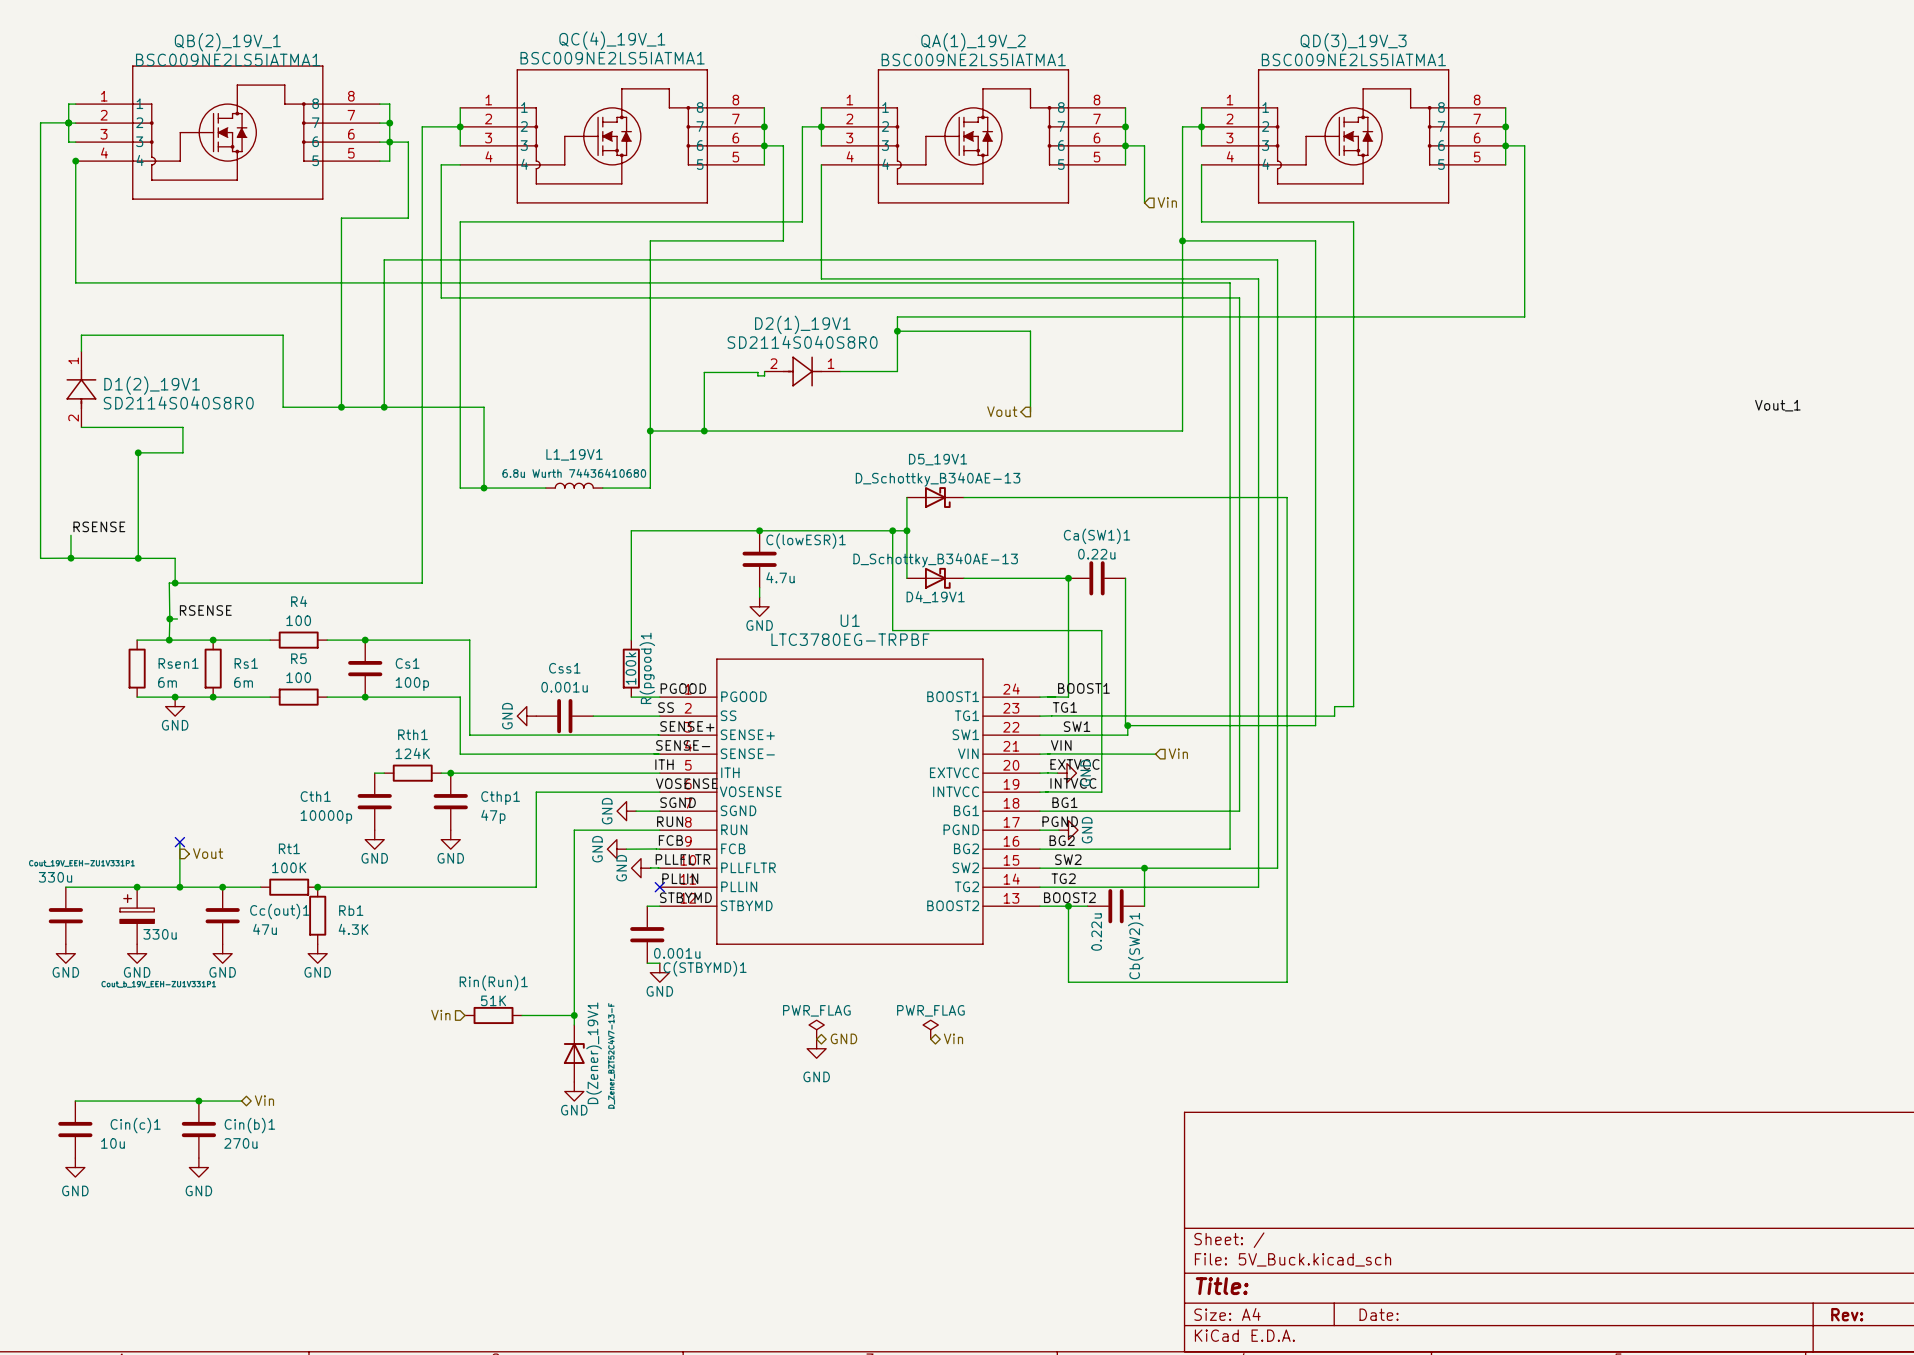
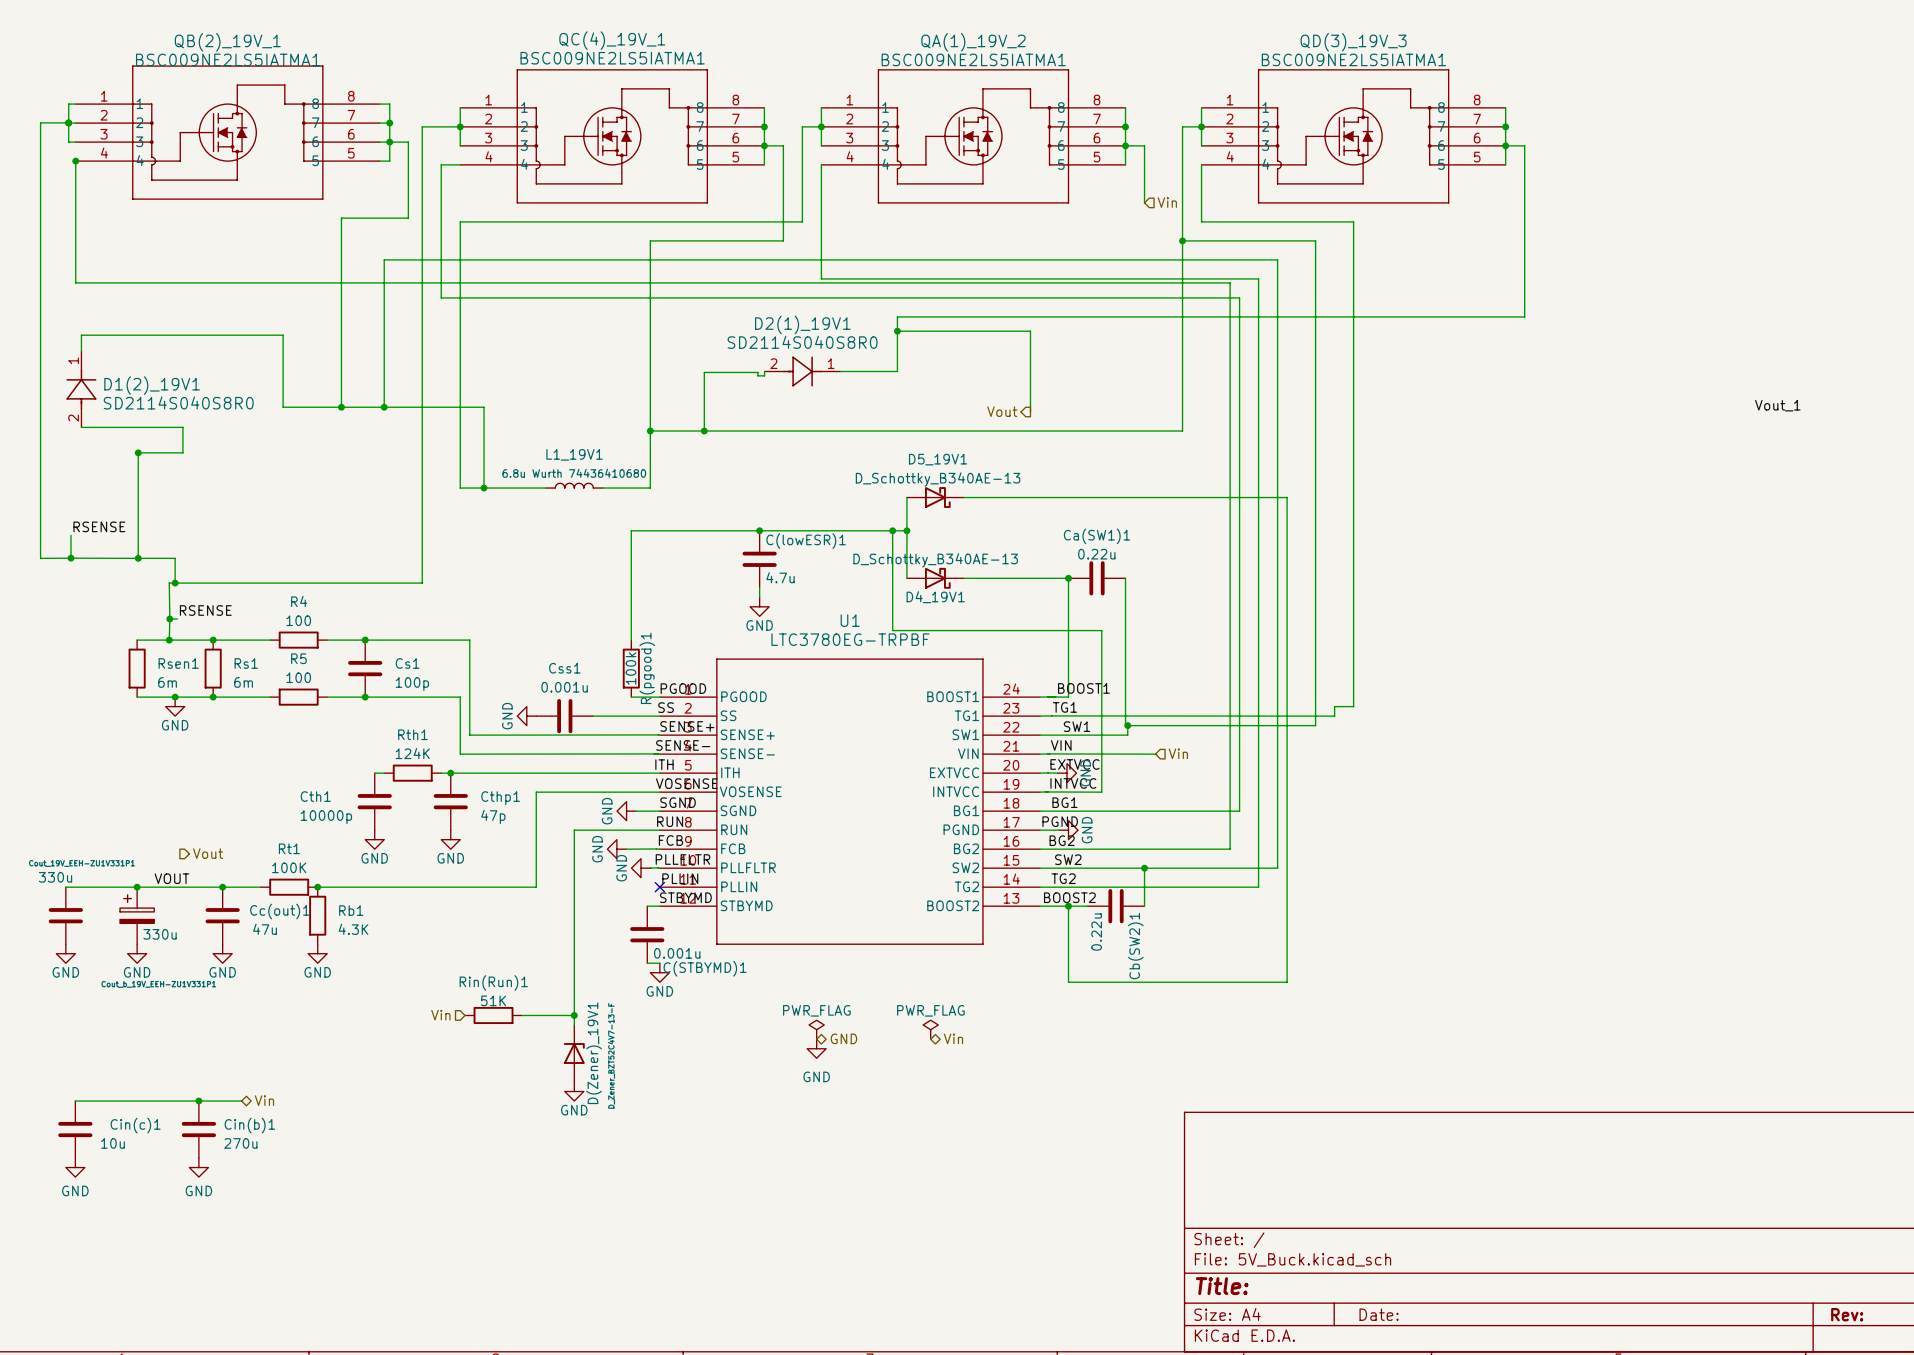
wire: (179, 842) (179, 887) -> none
no-connect mark: (179, 842) -> none
label: none -> VOUT (171, 878)
junction: (179, 887) -> none

